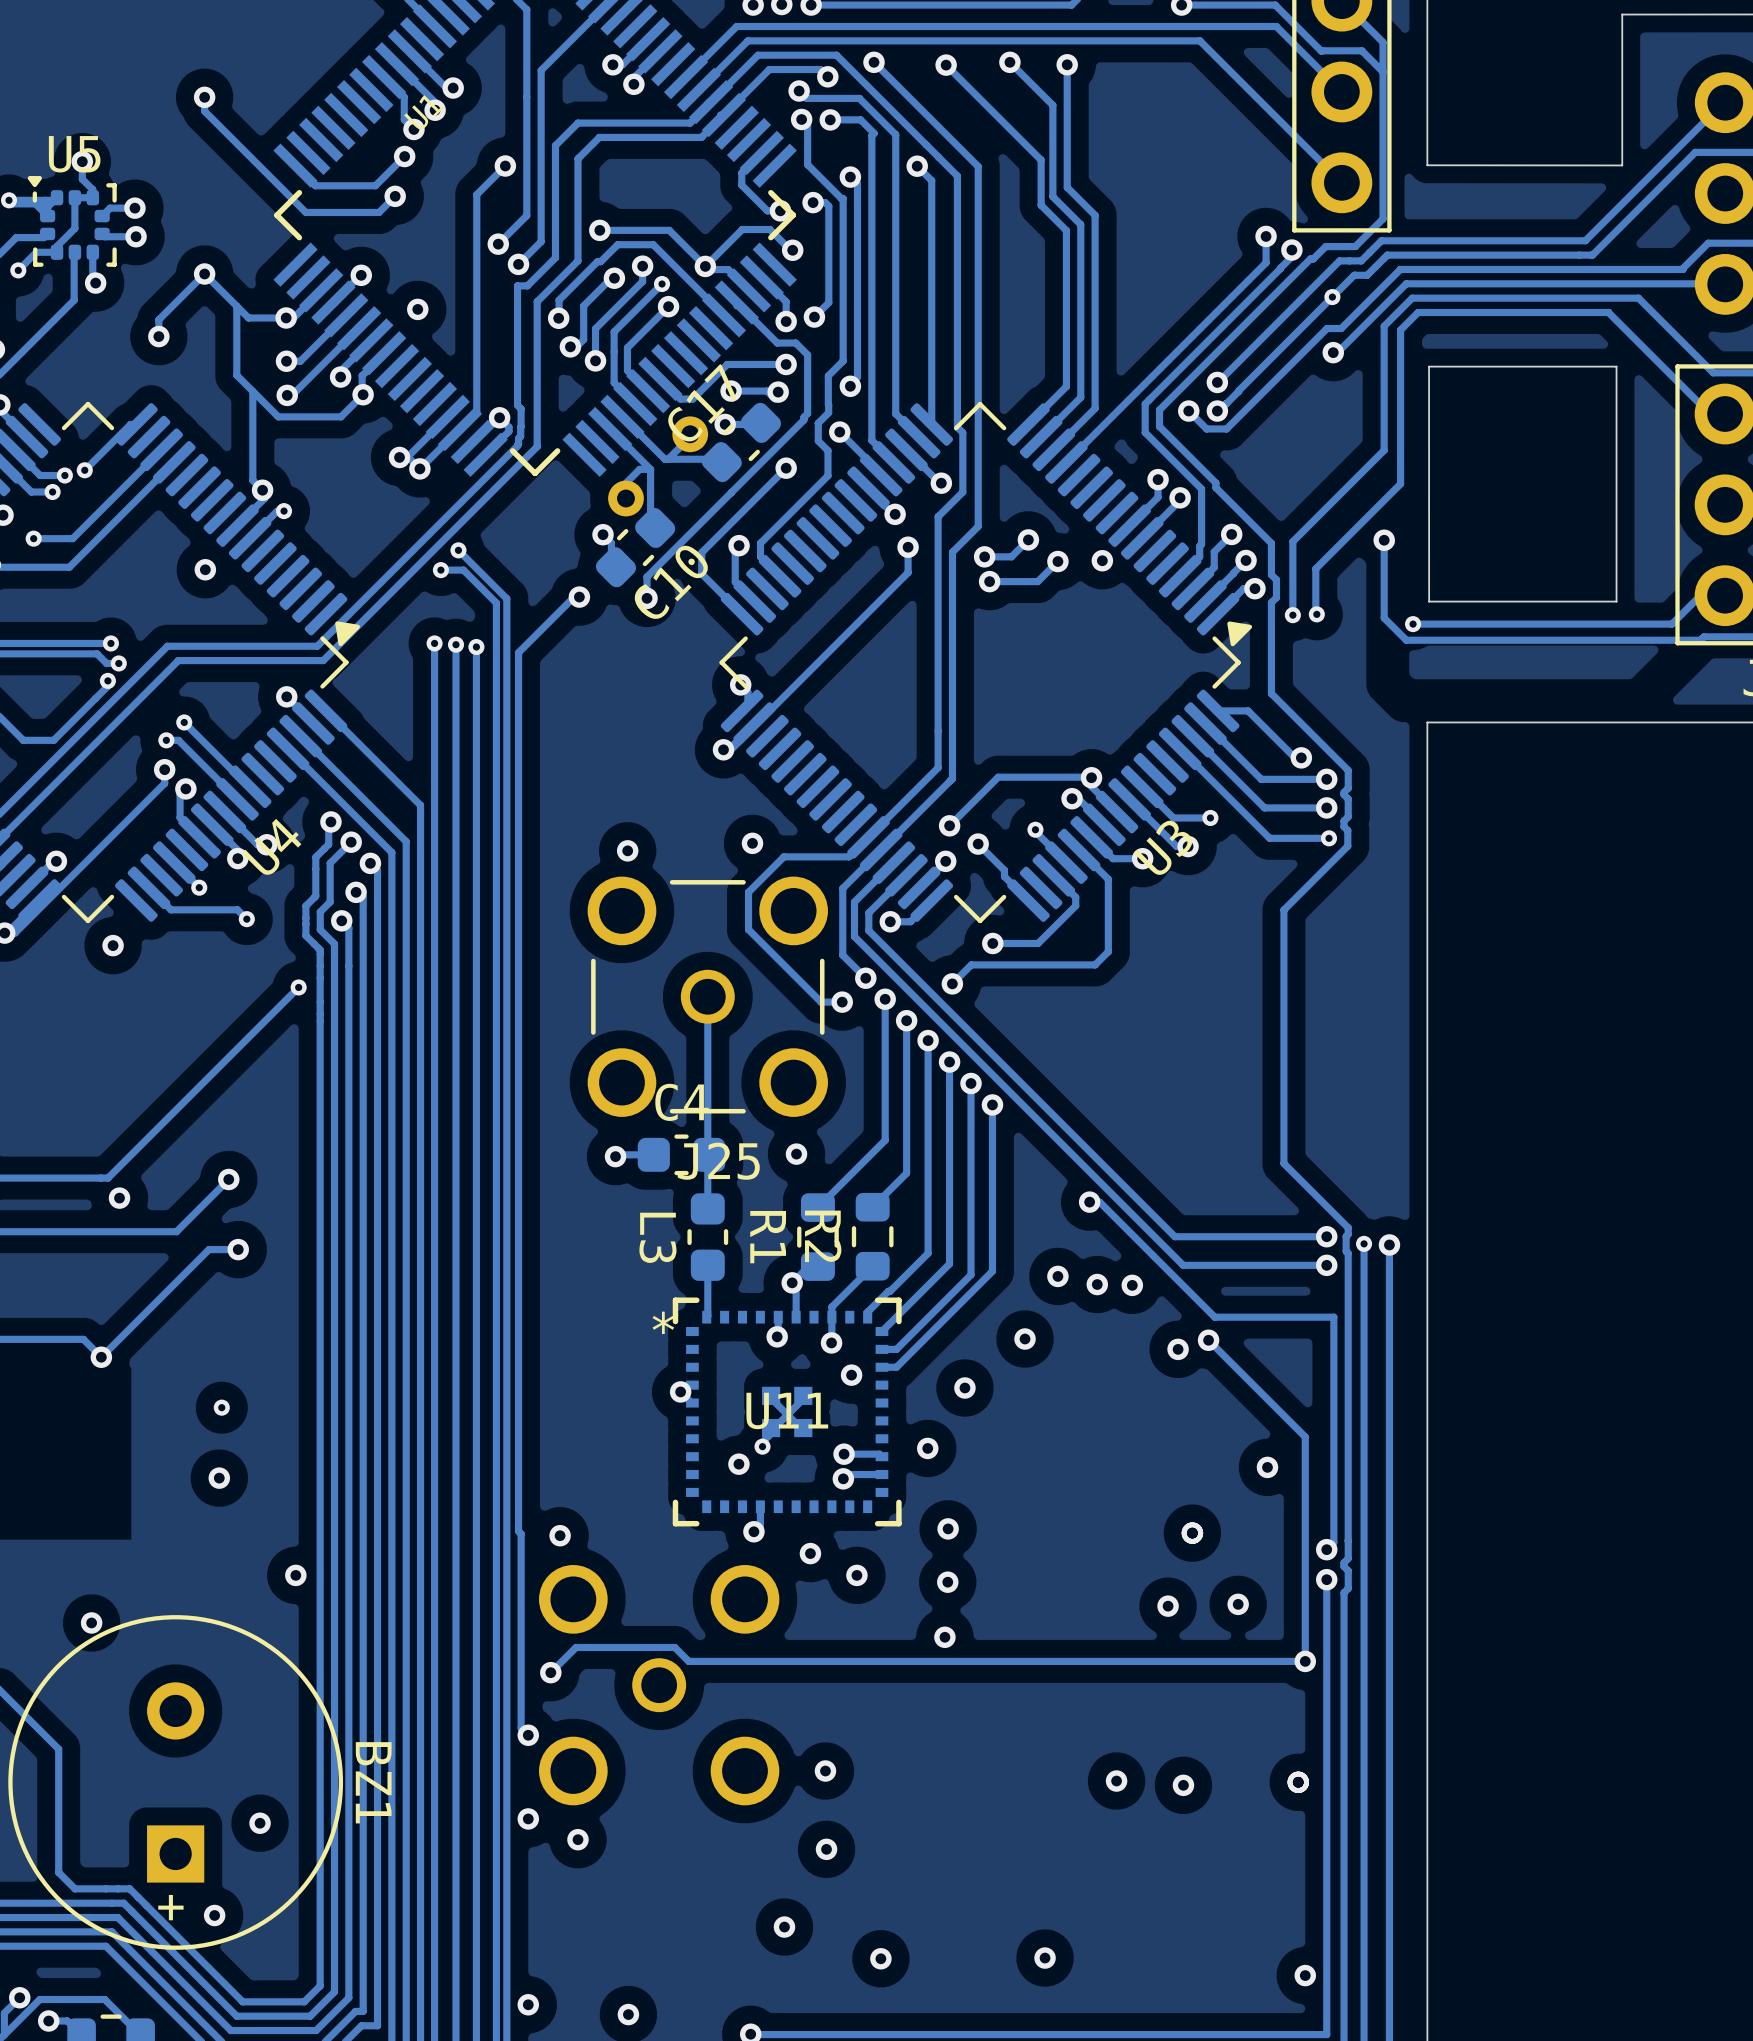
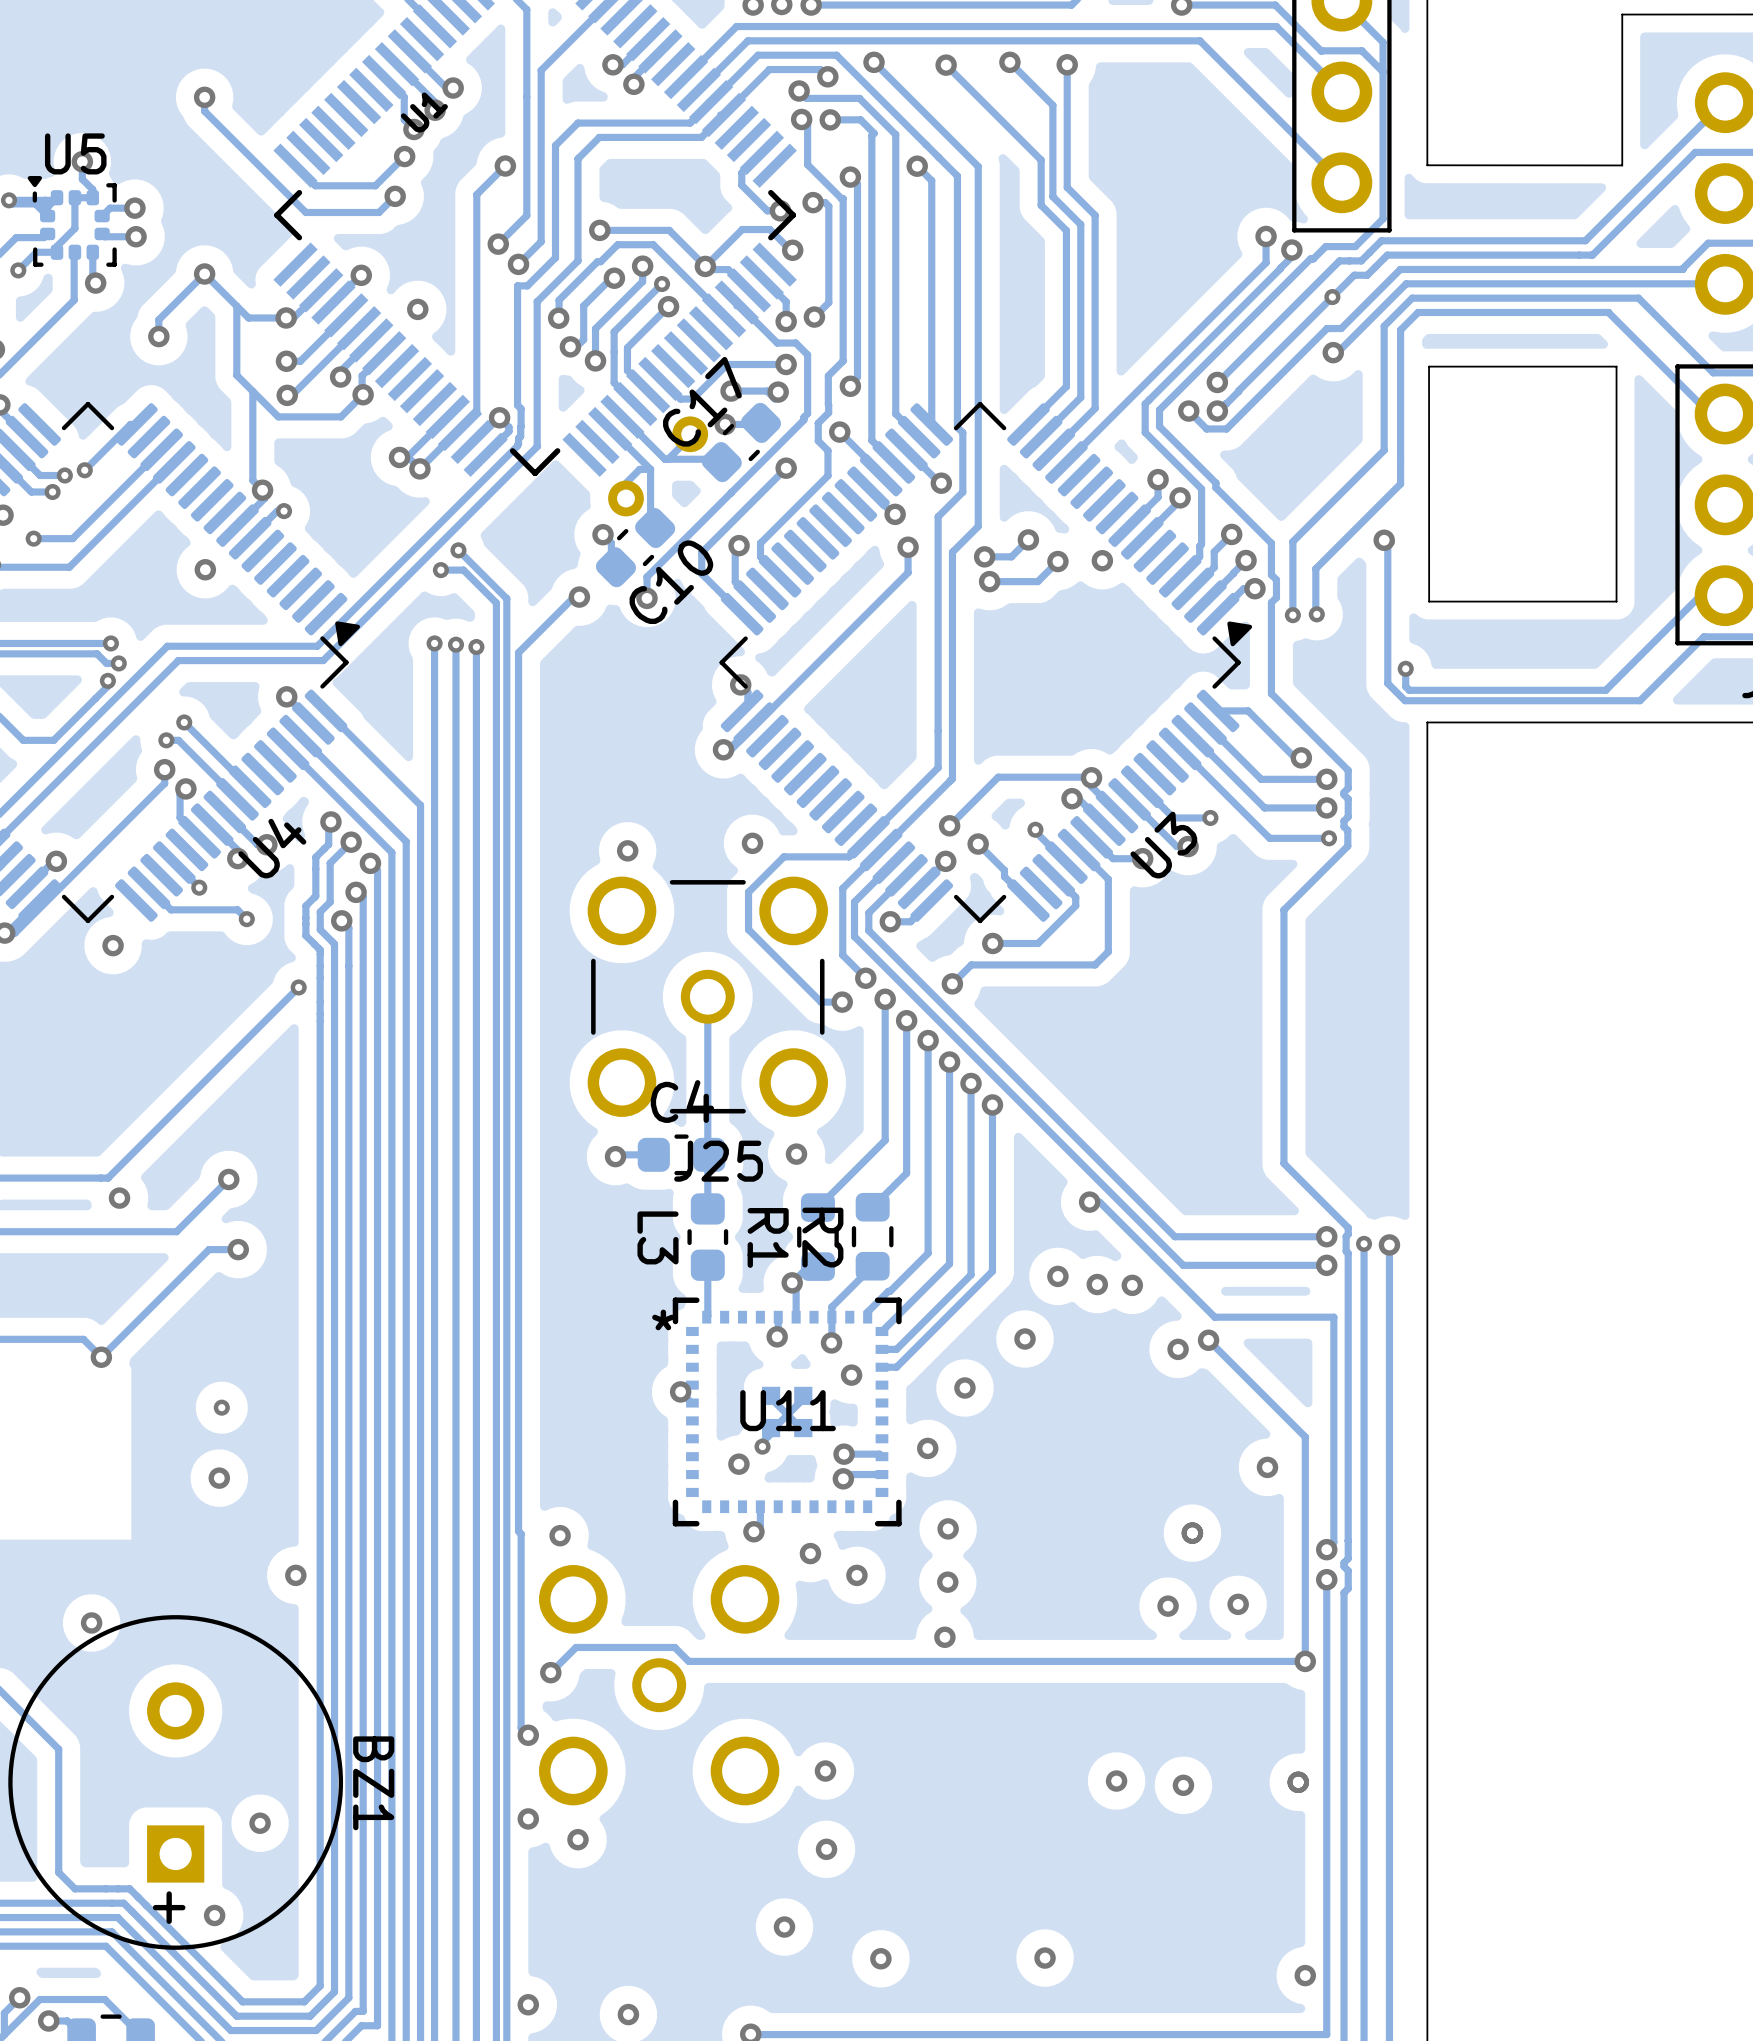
track: (1384, 540) (1384, 618) (1406, 640) (1700, 640) -> (1387, 543) (1387, 683) (1405, 700) (1640, 700) (1700, 640)
via position: (1413, 624) -> (1405, 668)
track: (1671, 624) (1413, 624) -> (1671, 624) (1605, 690) (1409, 690) (1405, 686) (1405, 668)

